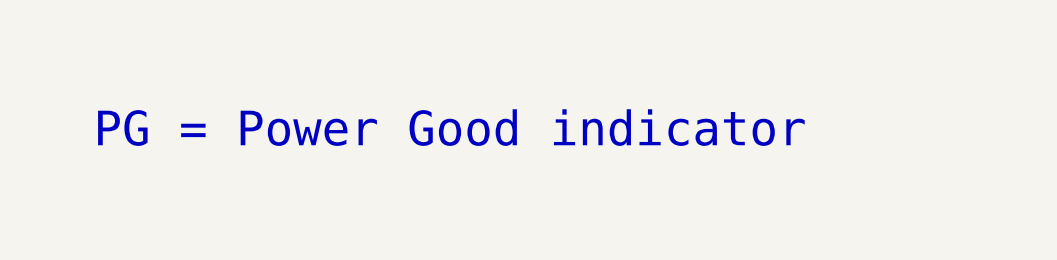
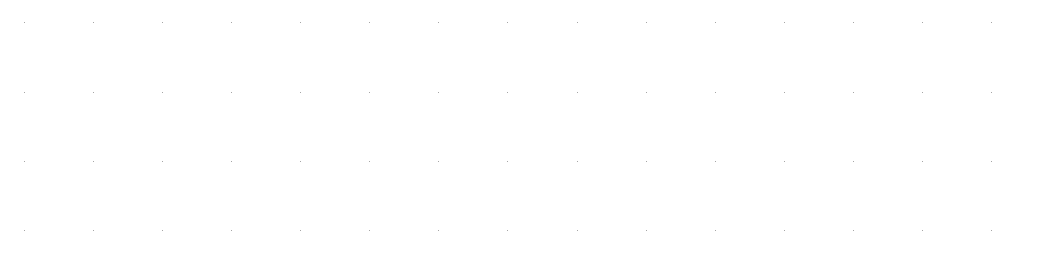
text: PG = Power Good indicator (451, 127) -> none

